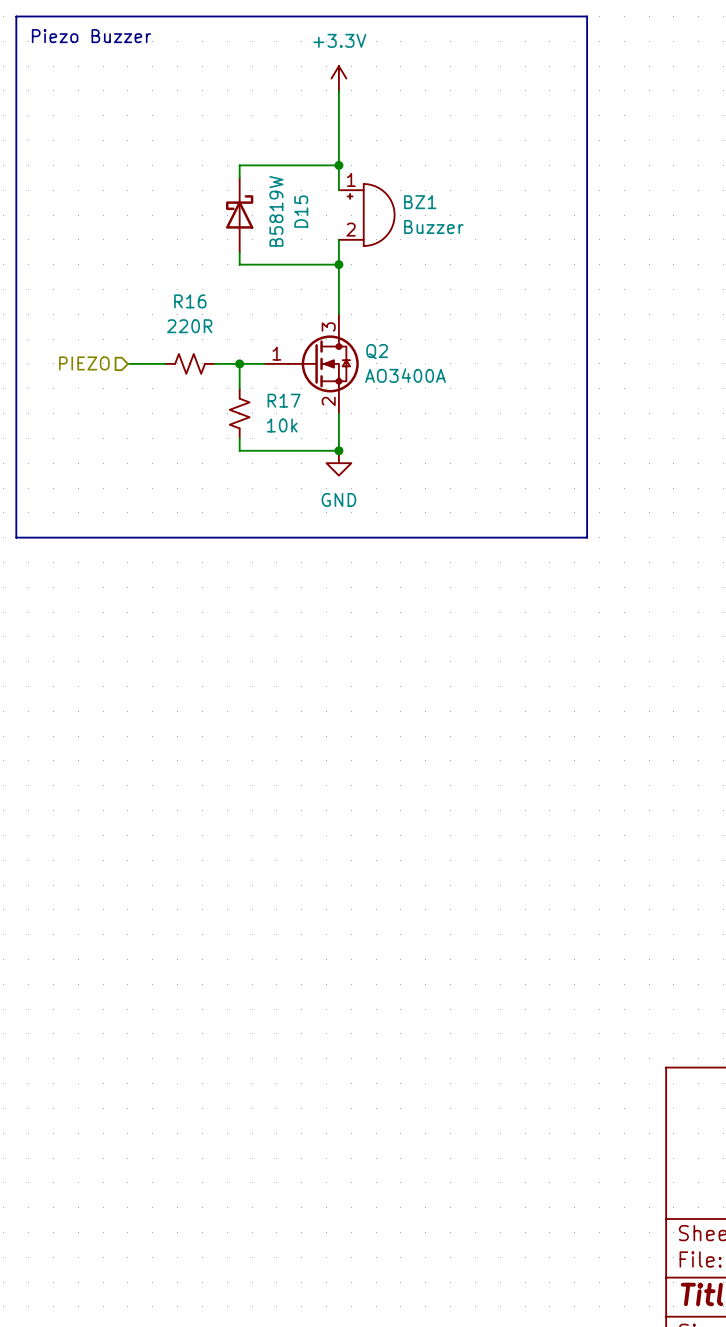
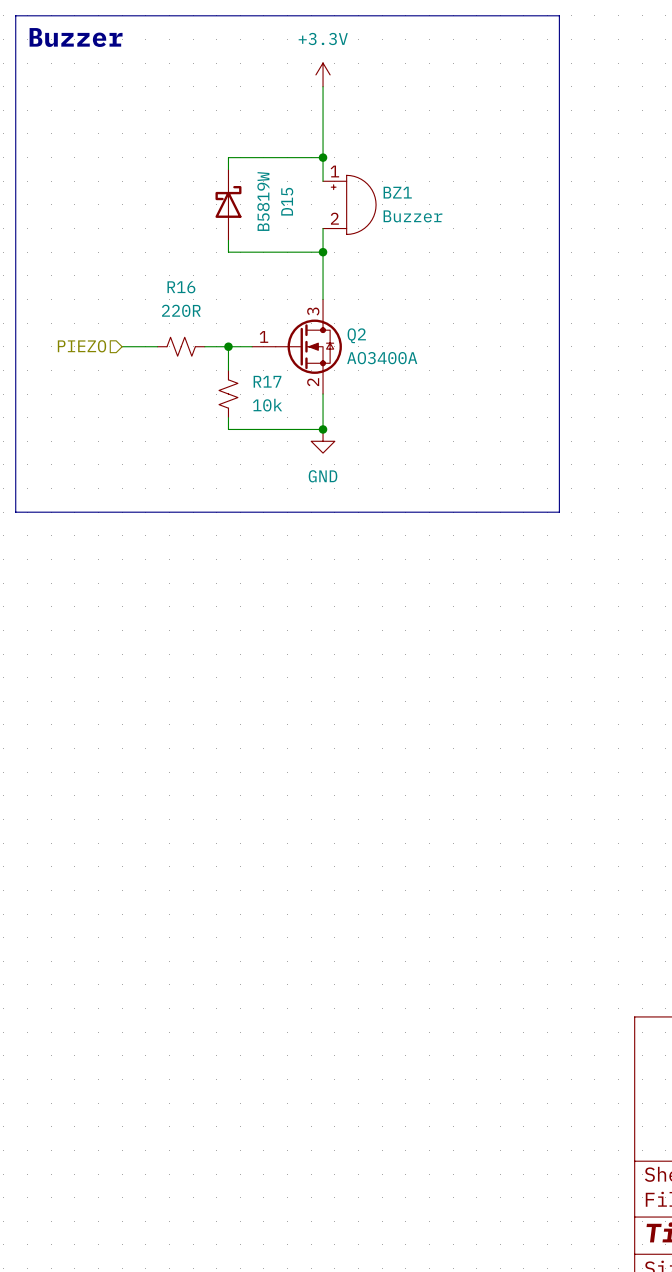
text: Piezo Buzzer (91, 36) -> Buzzer (76, 37)

